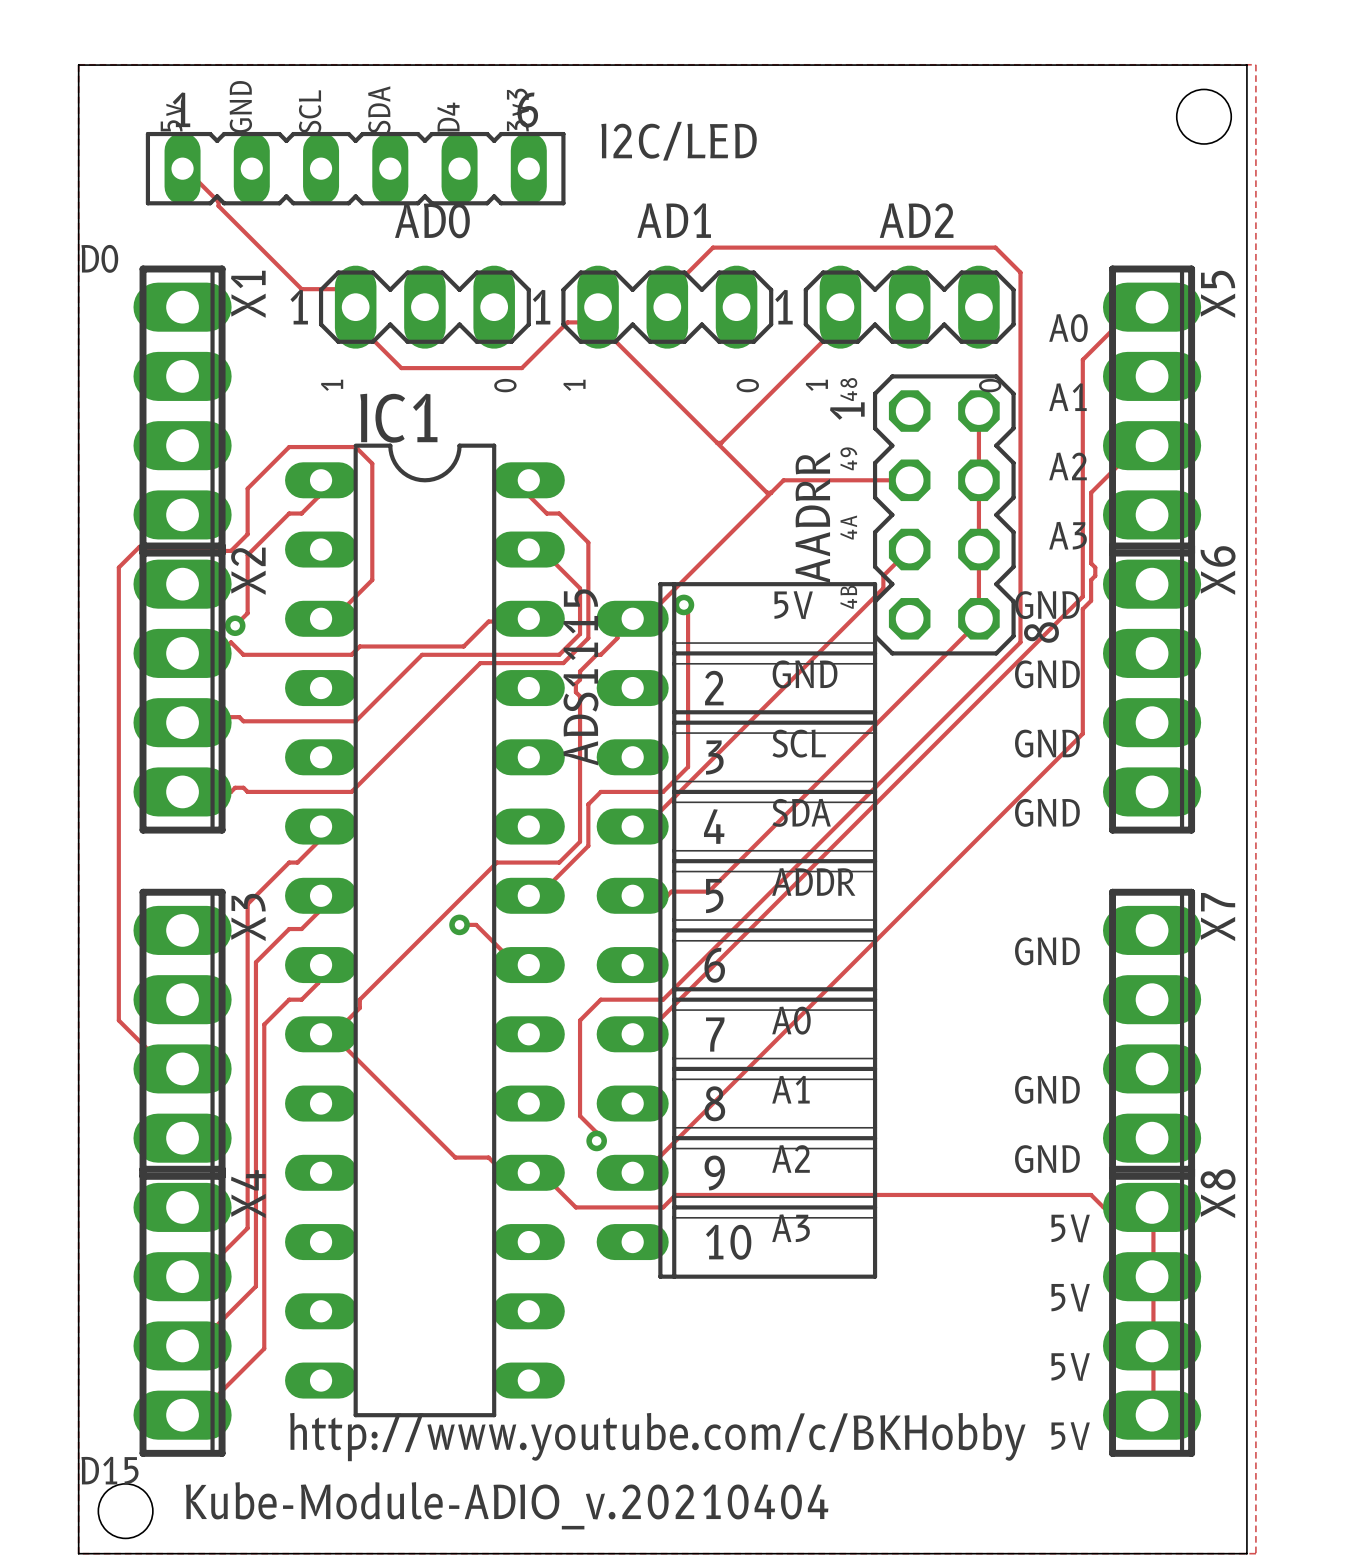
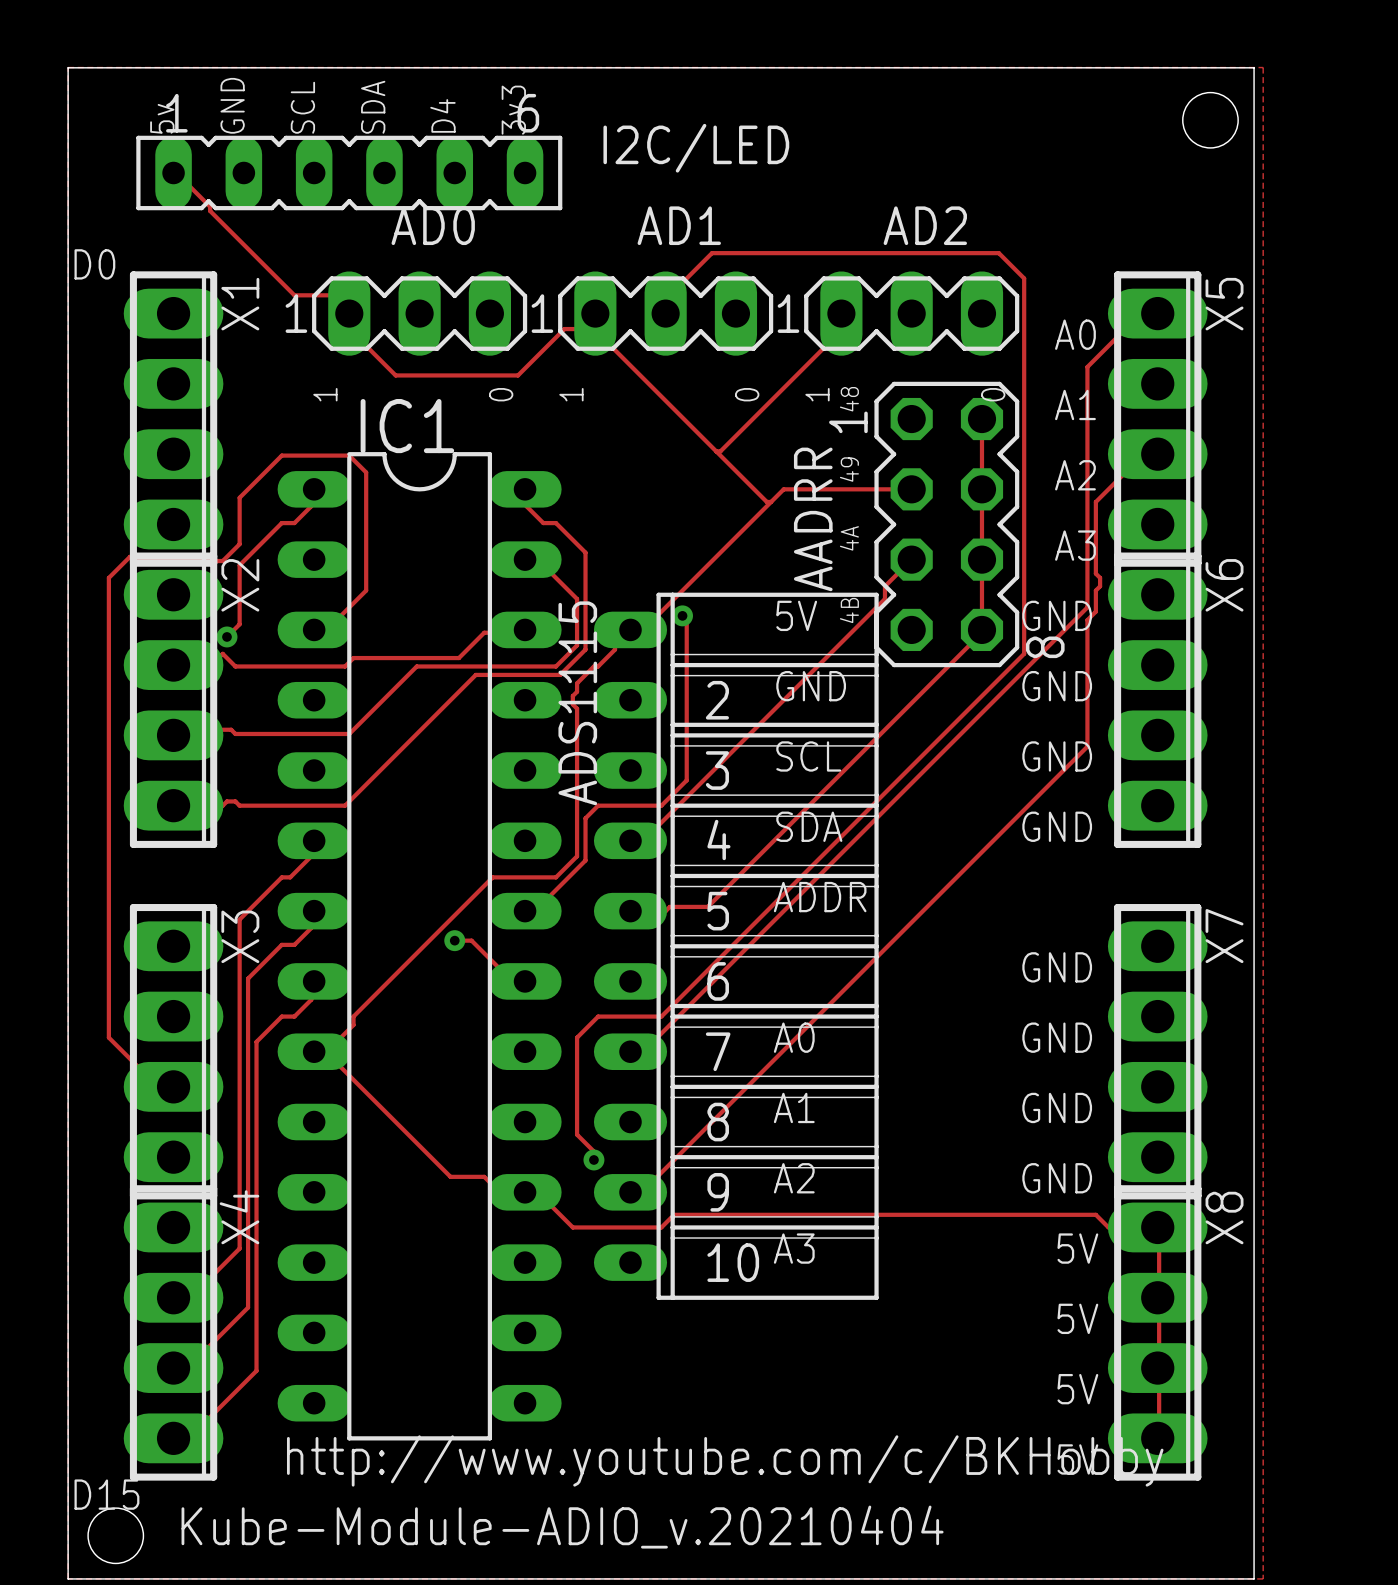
text: none -> GND (1057, 1037)

